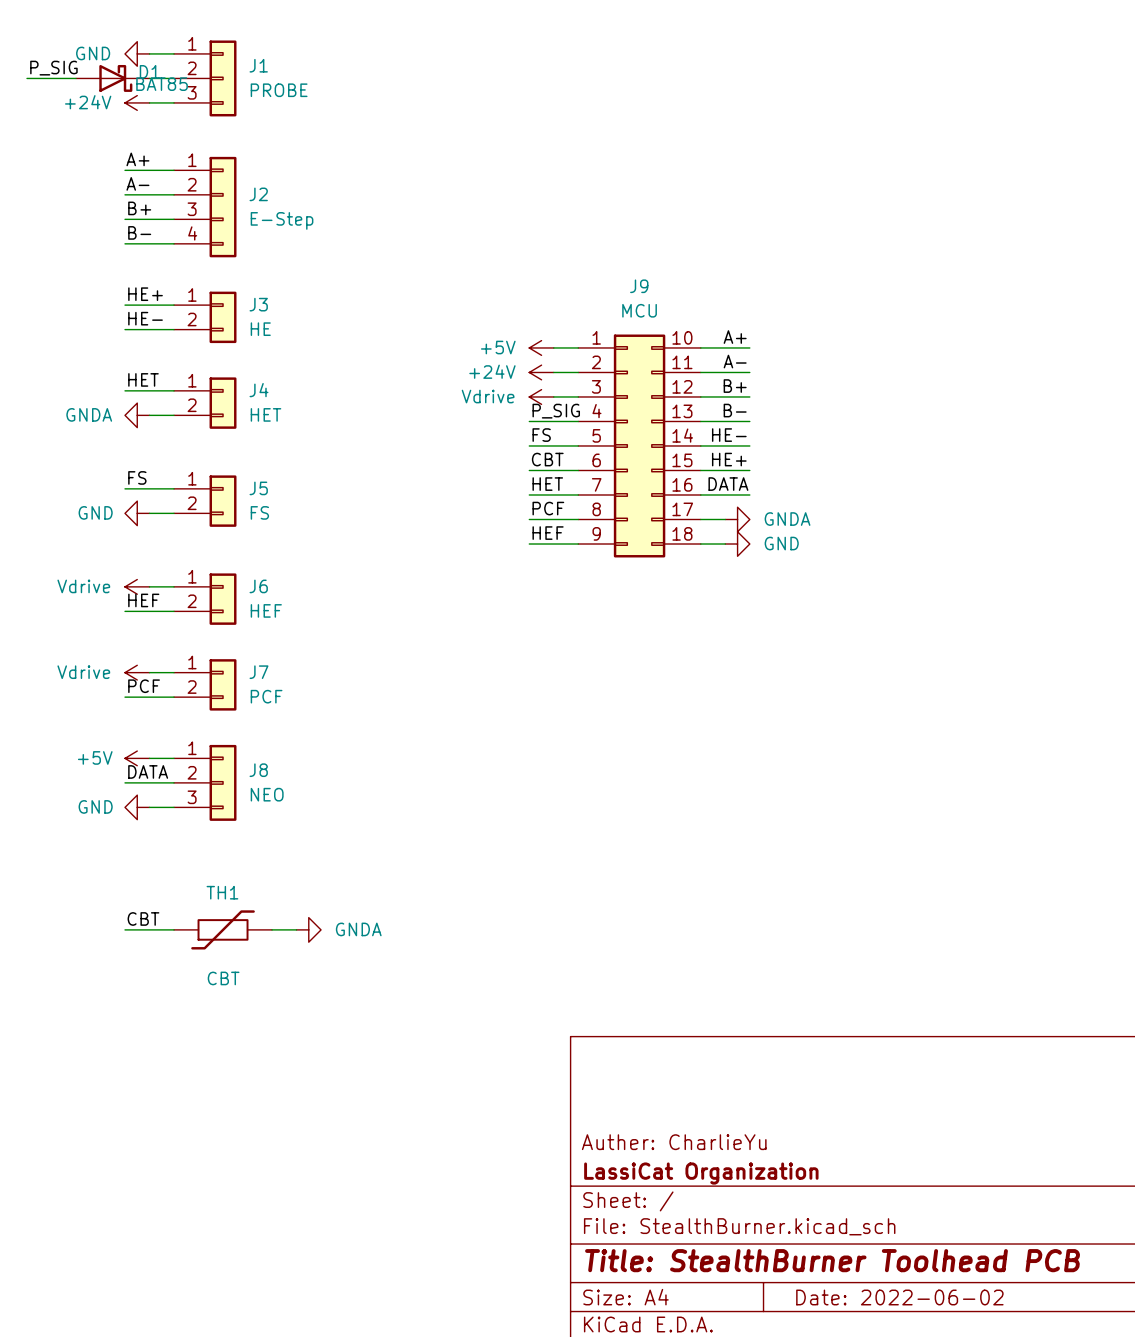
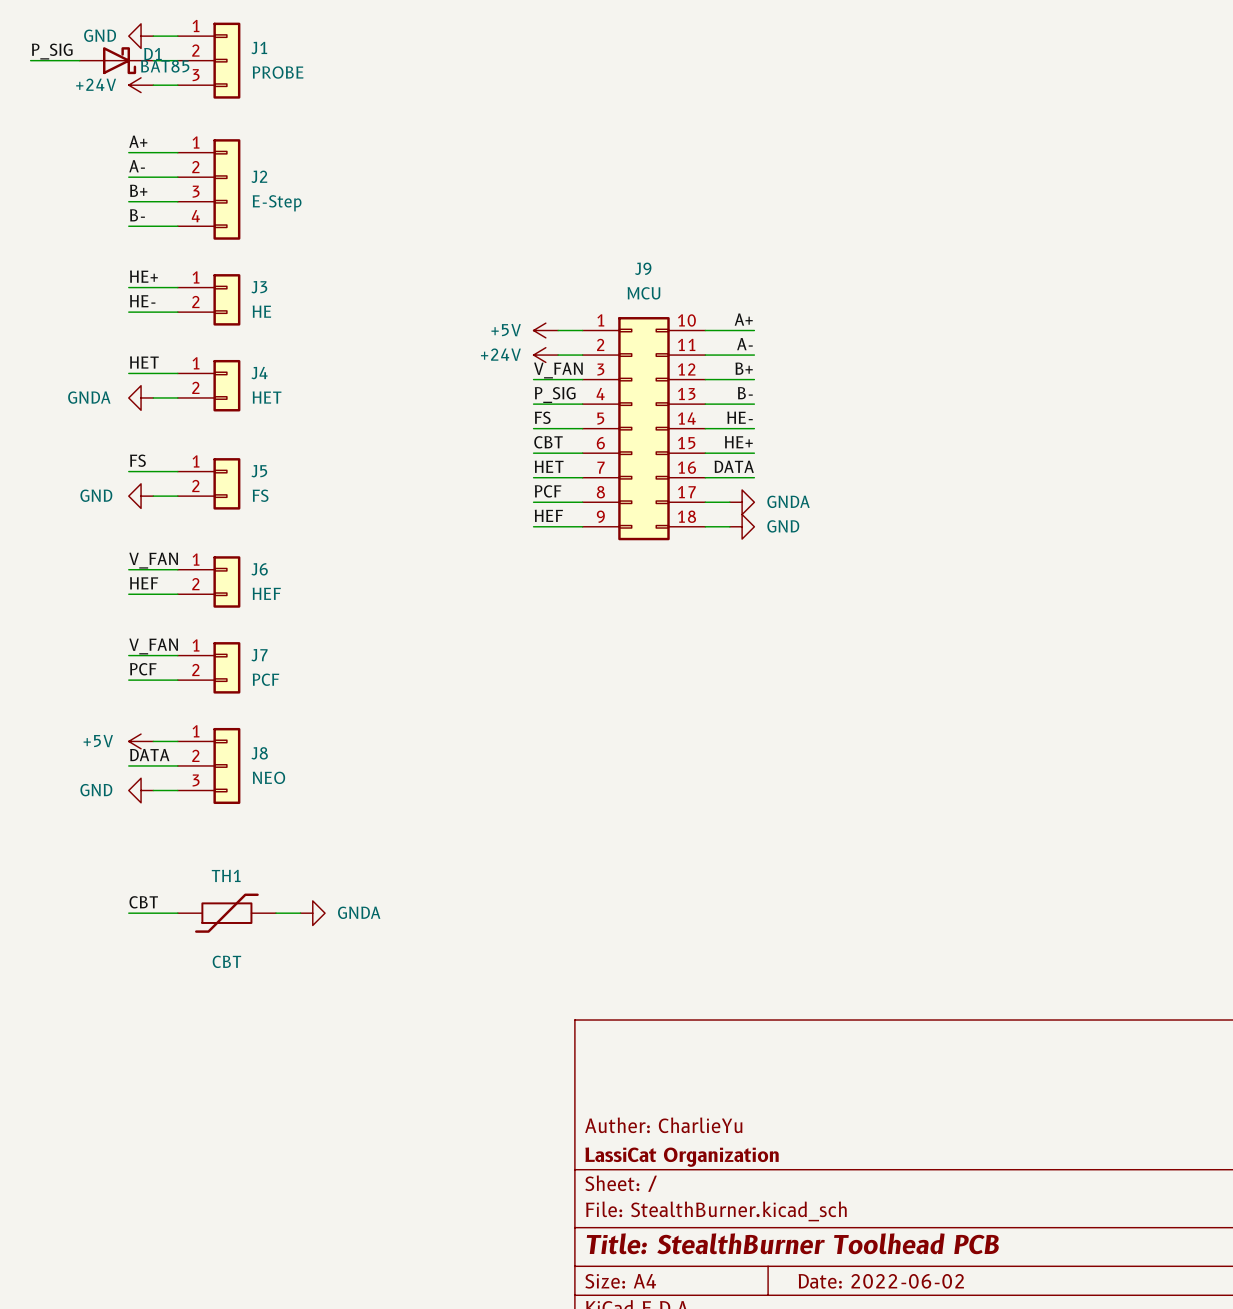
label: none -> V_FAN (558, 370)
power symbol: Vdrive (541, 396) -> none
label: none -> V_FAN (153, 560)
power symbol: Vdrive (137, 586) -> none
label: none -> V_FAN (153, 646)
power symbol: Vdrive (137, 672) -> none

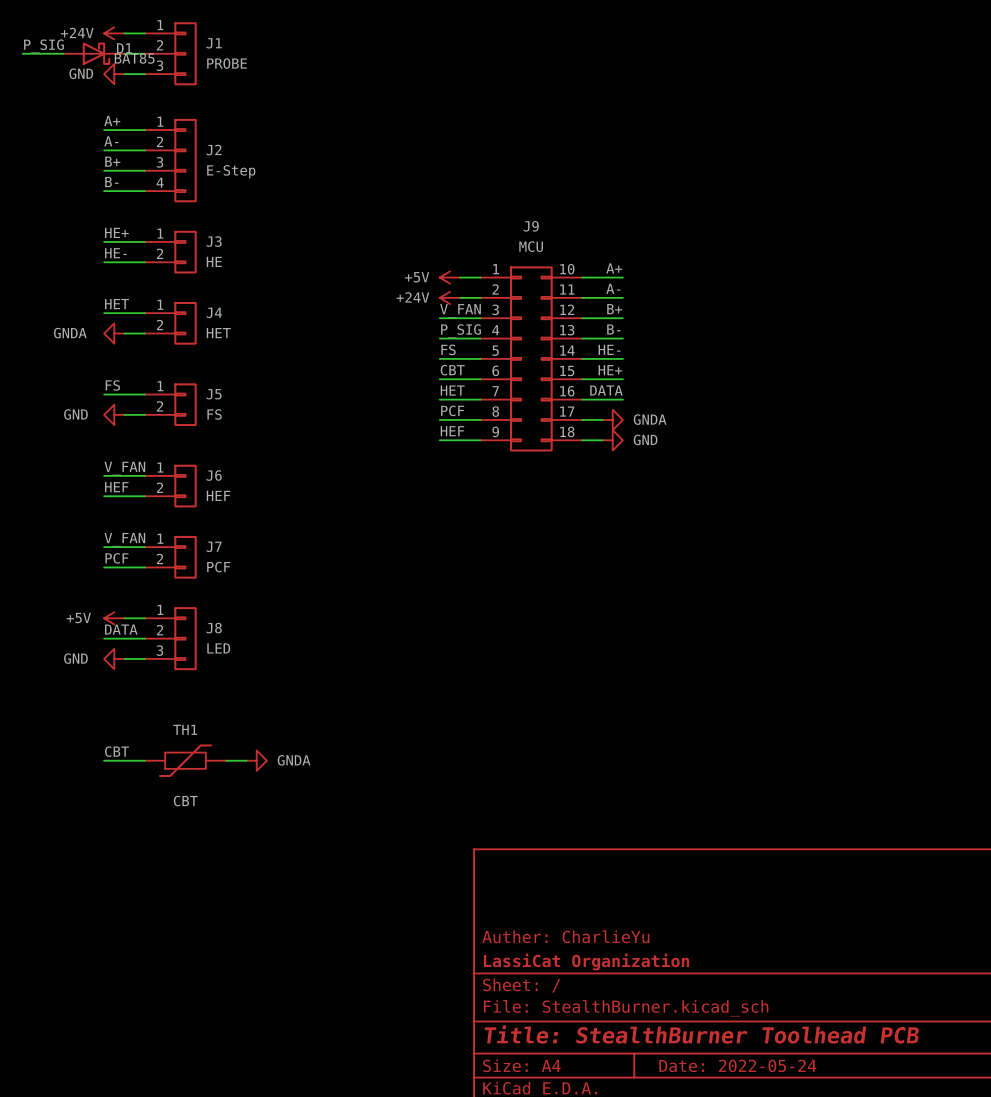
power symbol: GND (141, 36) -> +24V (114, 33)
power symbol: +24V (141, 85) -> GND (114, 74)
J8 value: NEO (268, 777) -> LED (218, 648)
title block: Date: 2022-06-02 (881, 1281) -> Date: 2022-05-24 (737, 1065)

